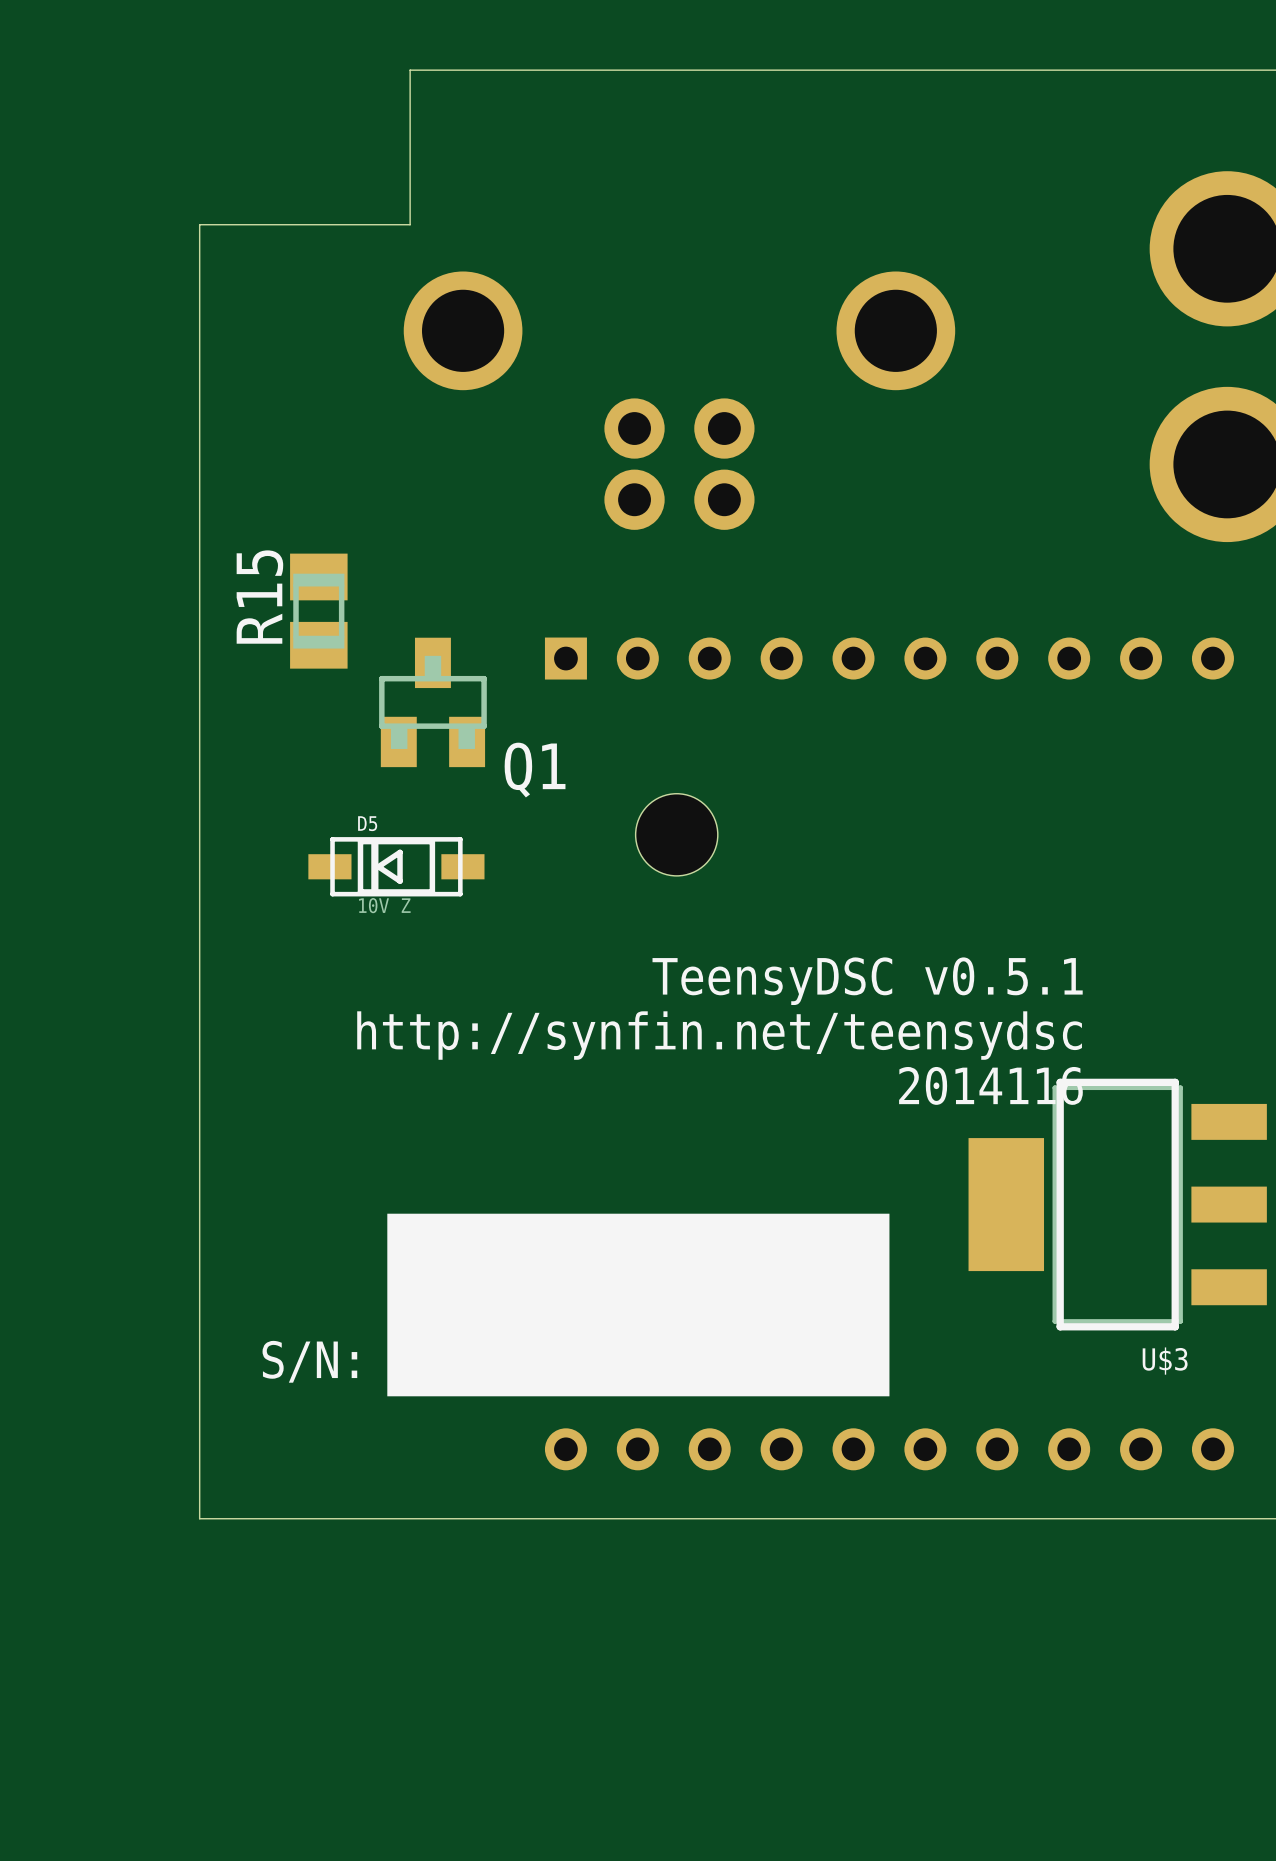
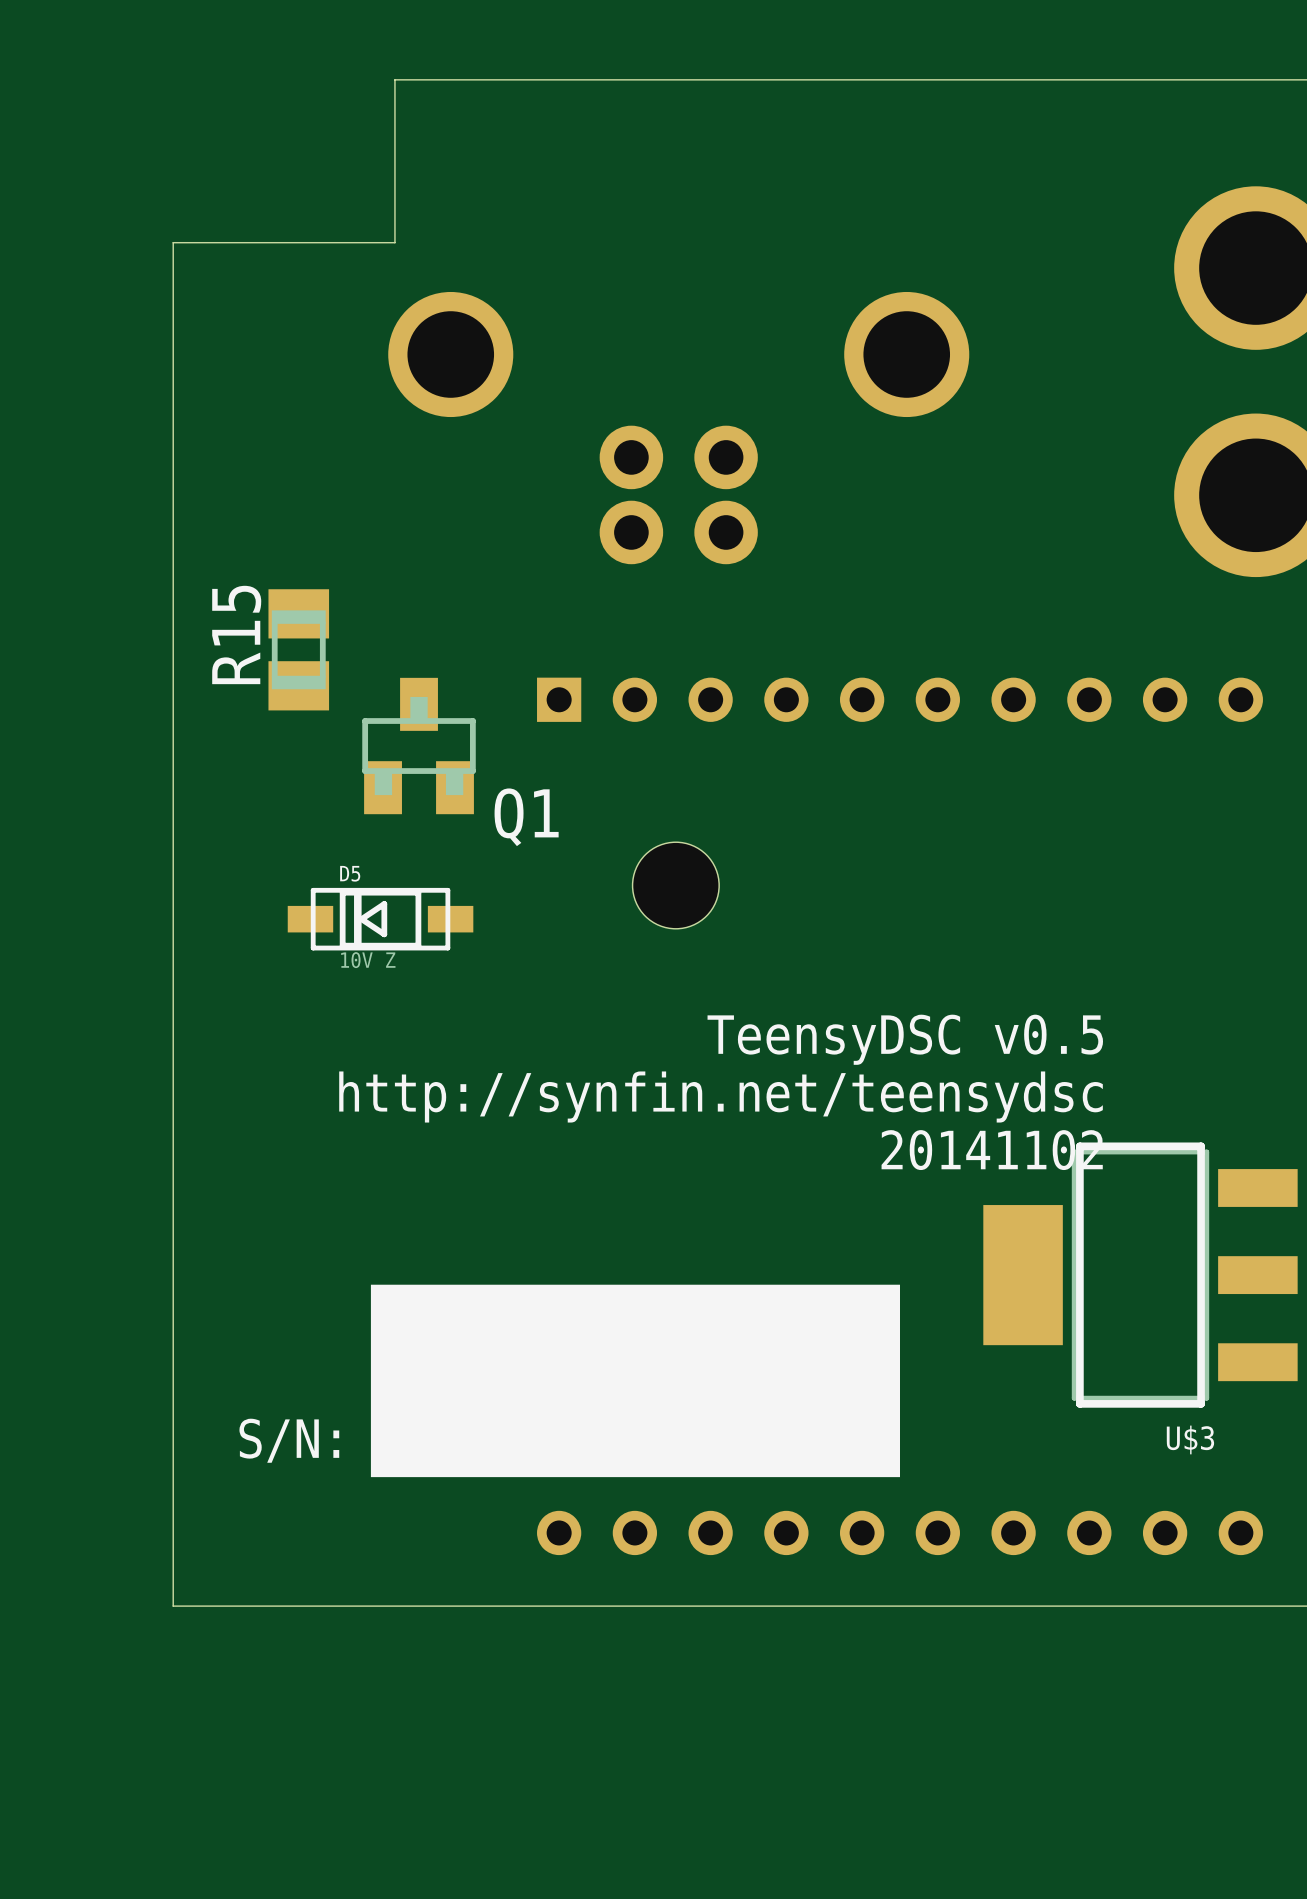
text: TeensyDSC v0.5.1 (867, 981) -> TeensyDSC v0.5 (905, 1039)
text: 2014116 (990, 1085) -> 20141102 (992, 1150)

